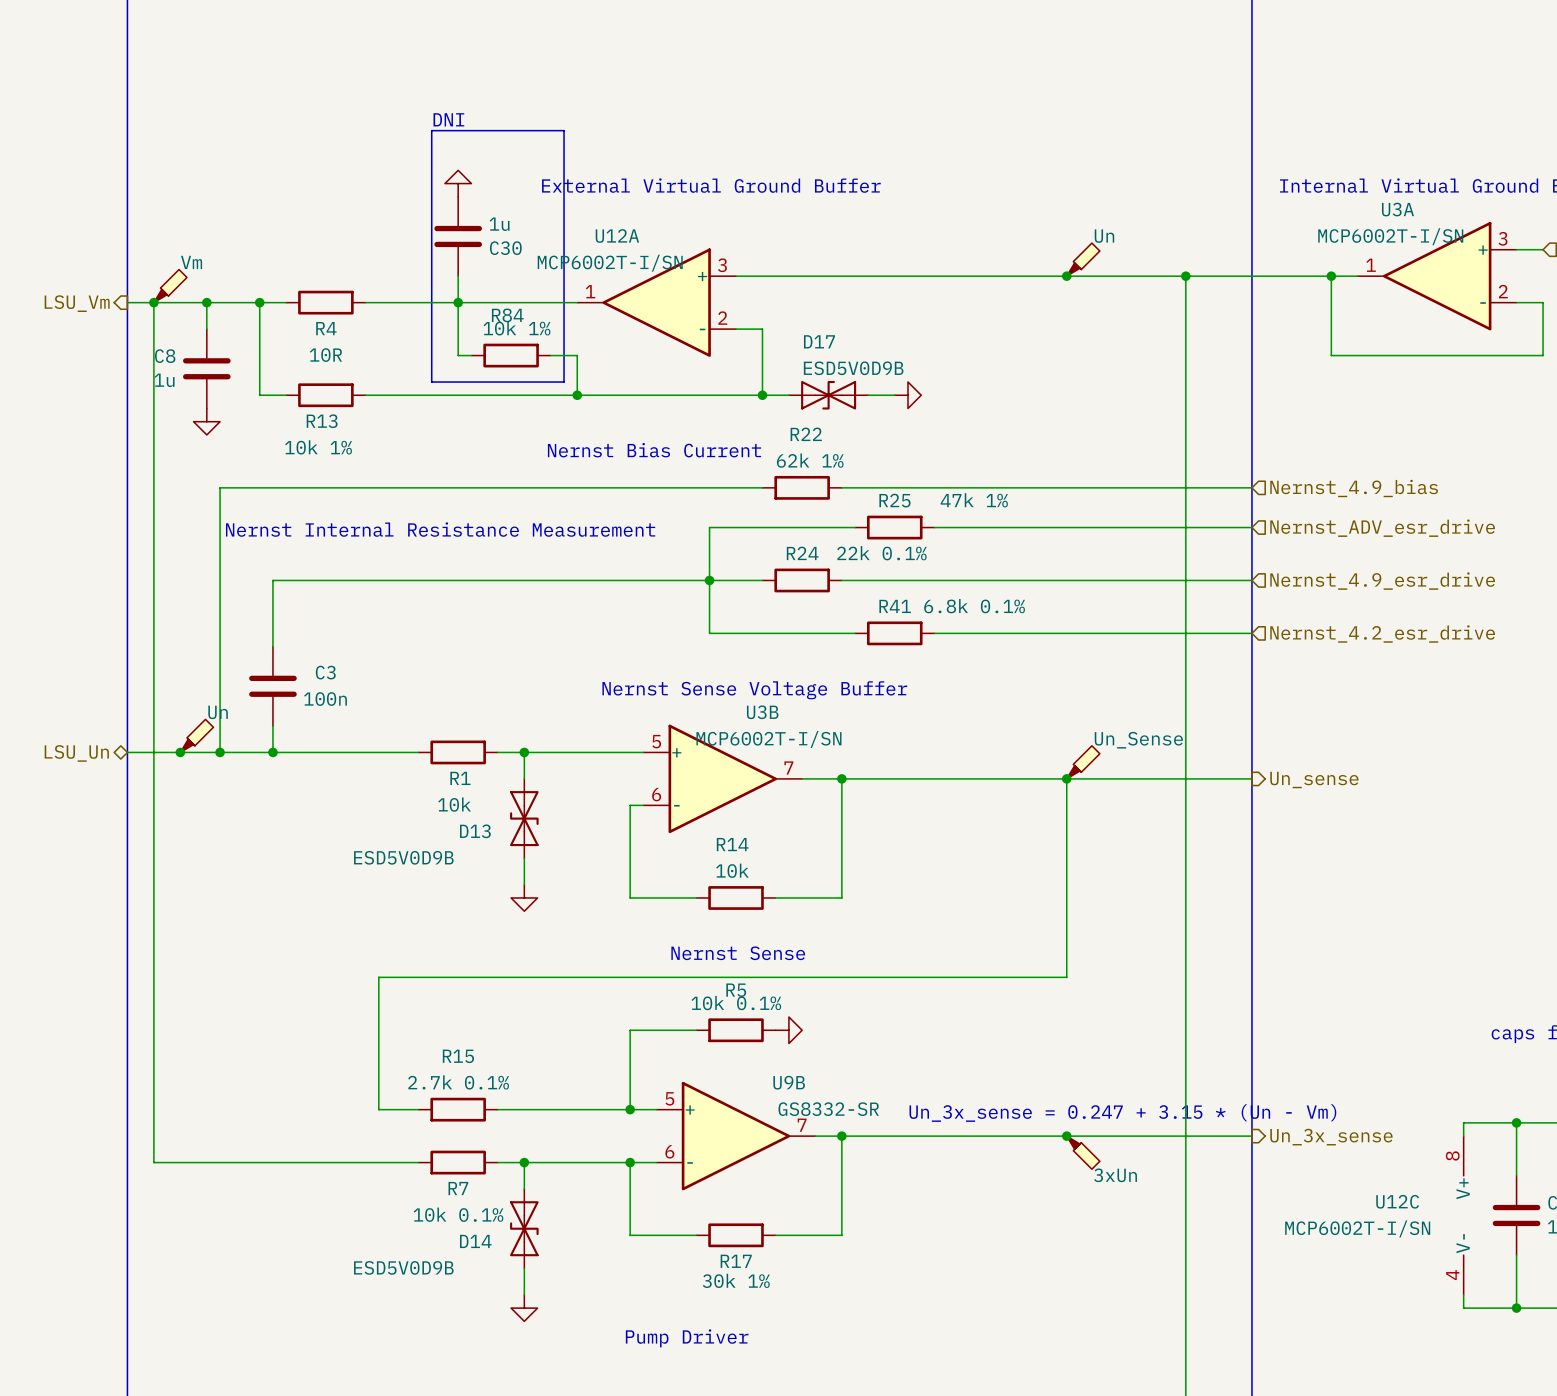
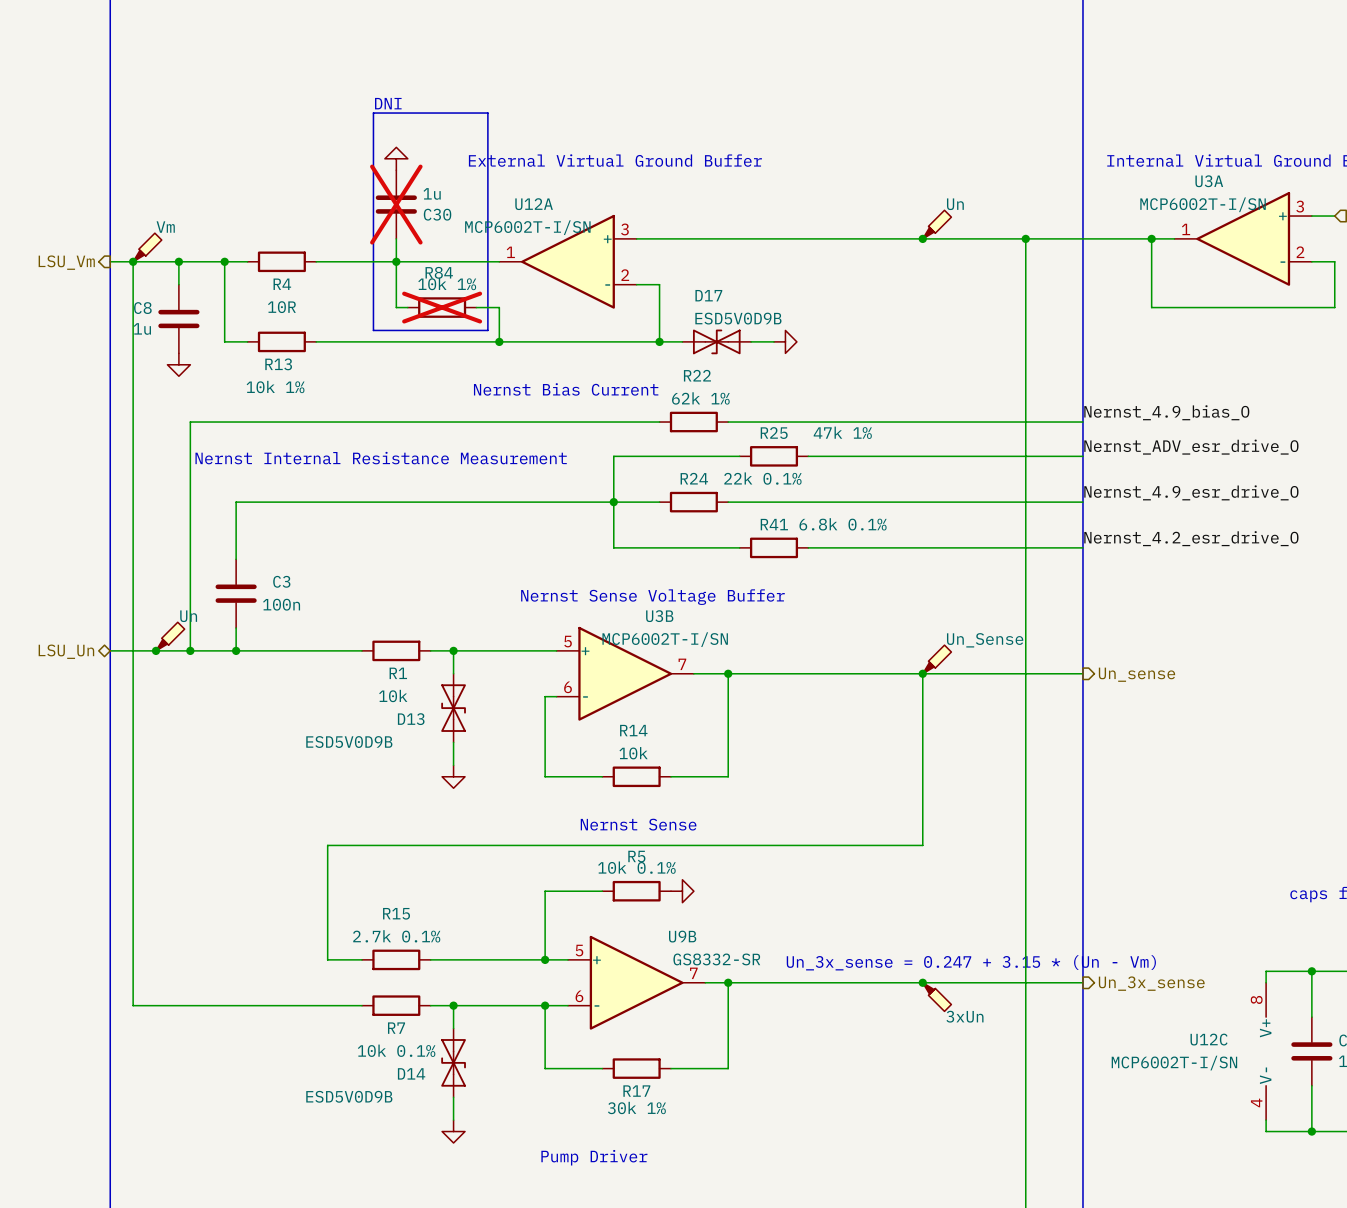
C30 do-not-place cross: none -> (396, 204)
R84 do-not-place cross: none -> (442, 307)
label: none -> Nernst_4.9_bias_O (1166, 412)
hierarchical label: Nernst_4.9_bias (1354, 488) -> none
label: none -> Nernst_ADV_esr_drive_O (1191, 447)
hierarchical label: Nernst_ADV_esr_drive (1382, 528) -> none
label: none -> Nernst_4.9_esr_drive_O (1191, 492)
hierarchical label: Nernst_4.9_esr_drive (1382, 581) -> none
label: none -> Nernst_4.2_esr_drive_O (1191, 538)
hierarchical label: Nernst_4.2_esr_drive (1382, 634) -> none

